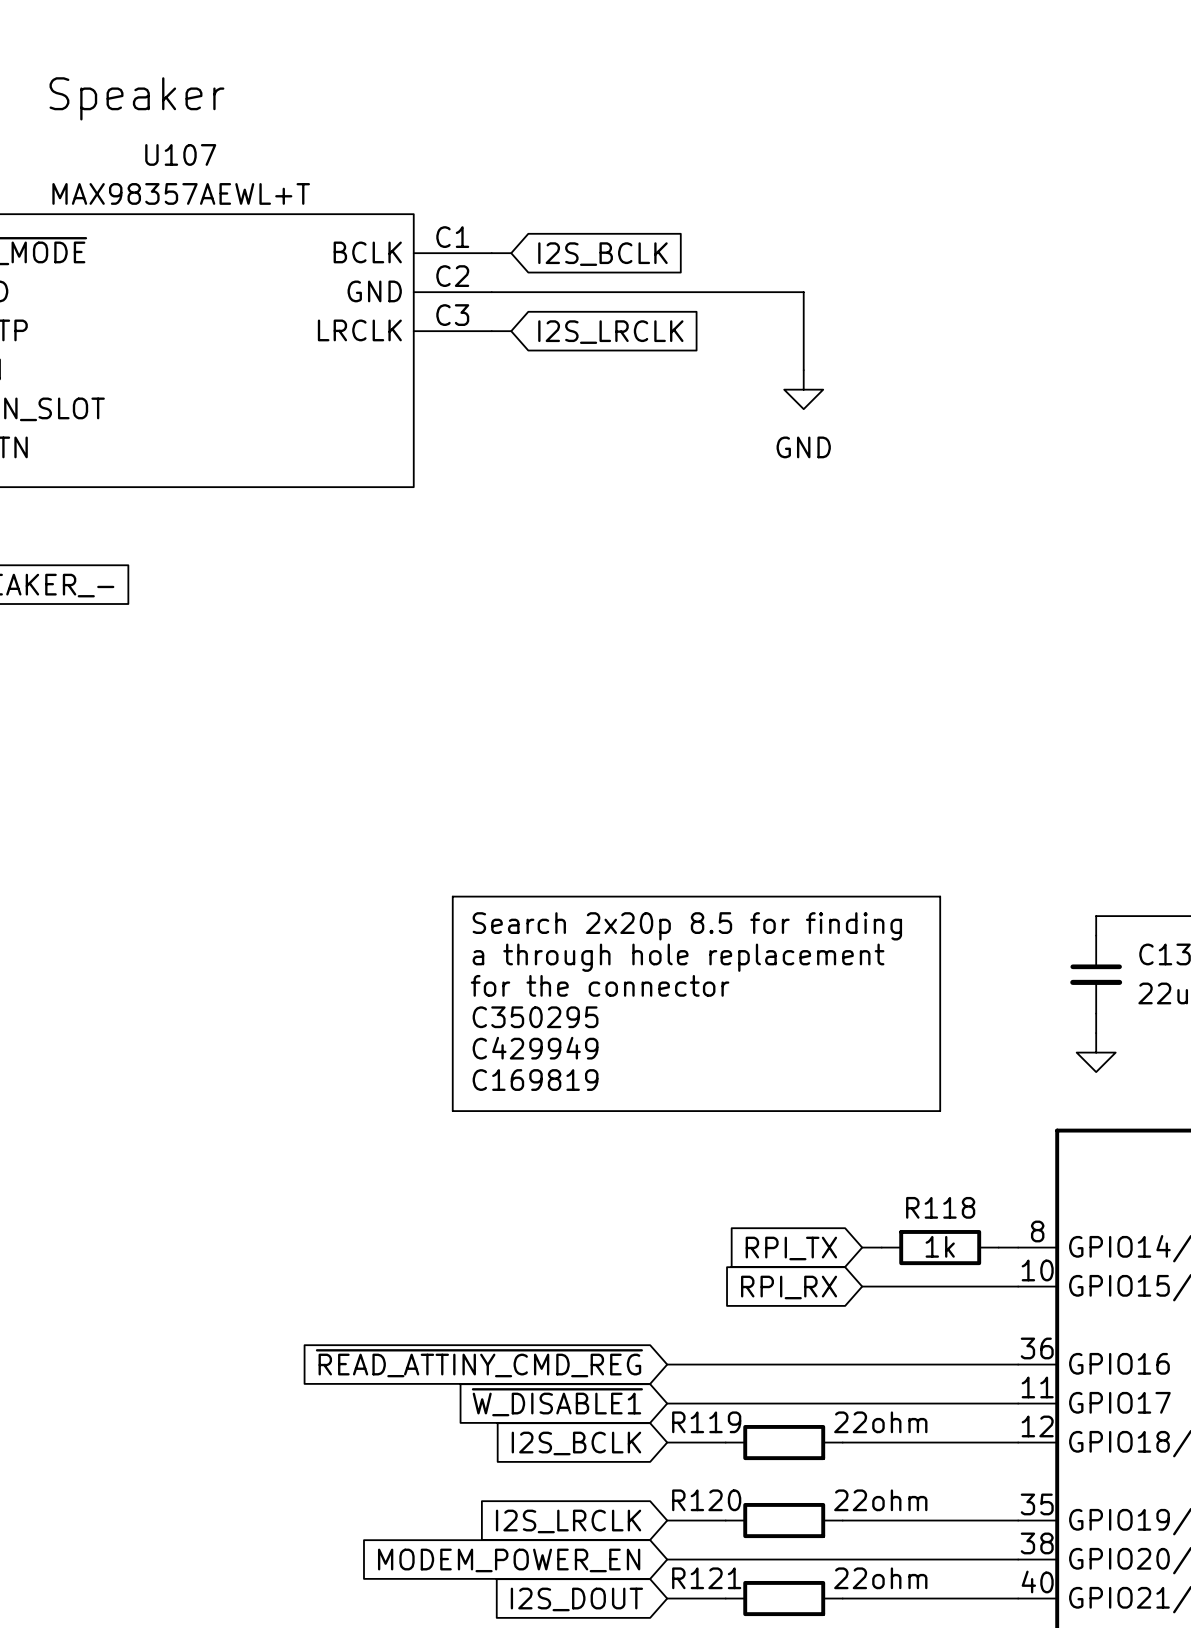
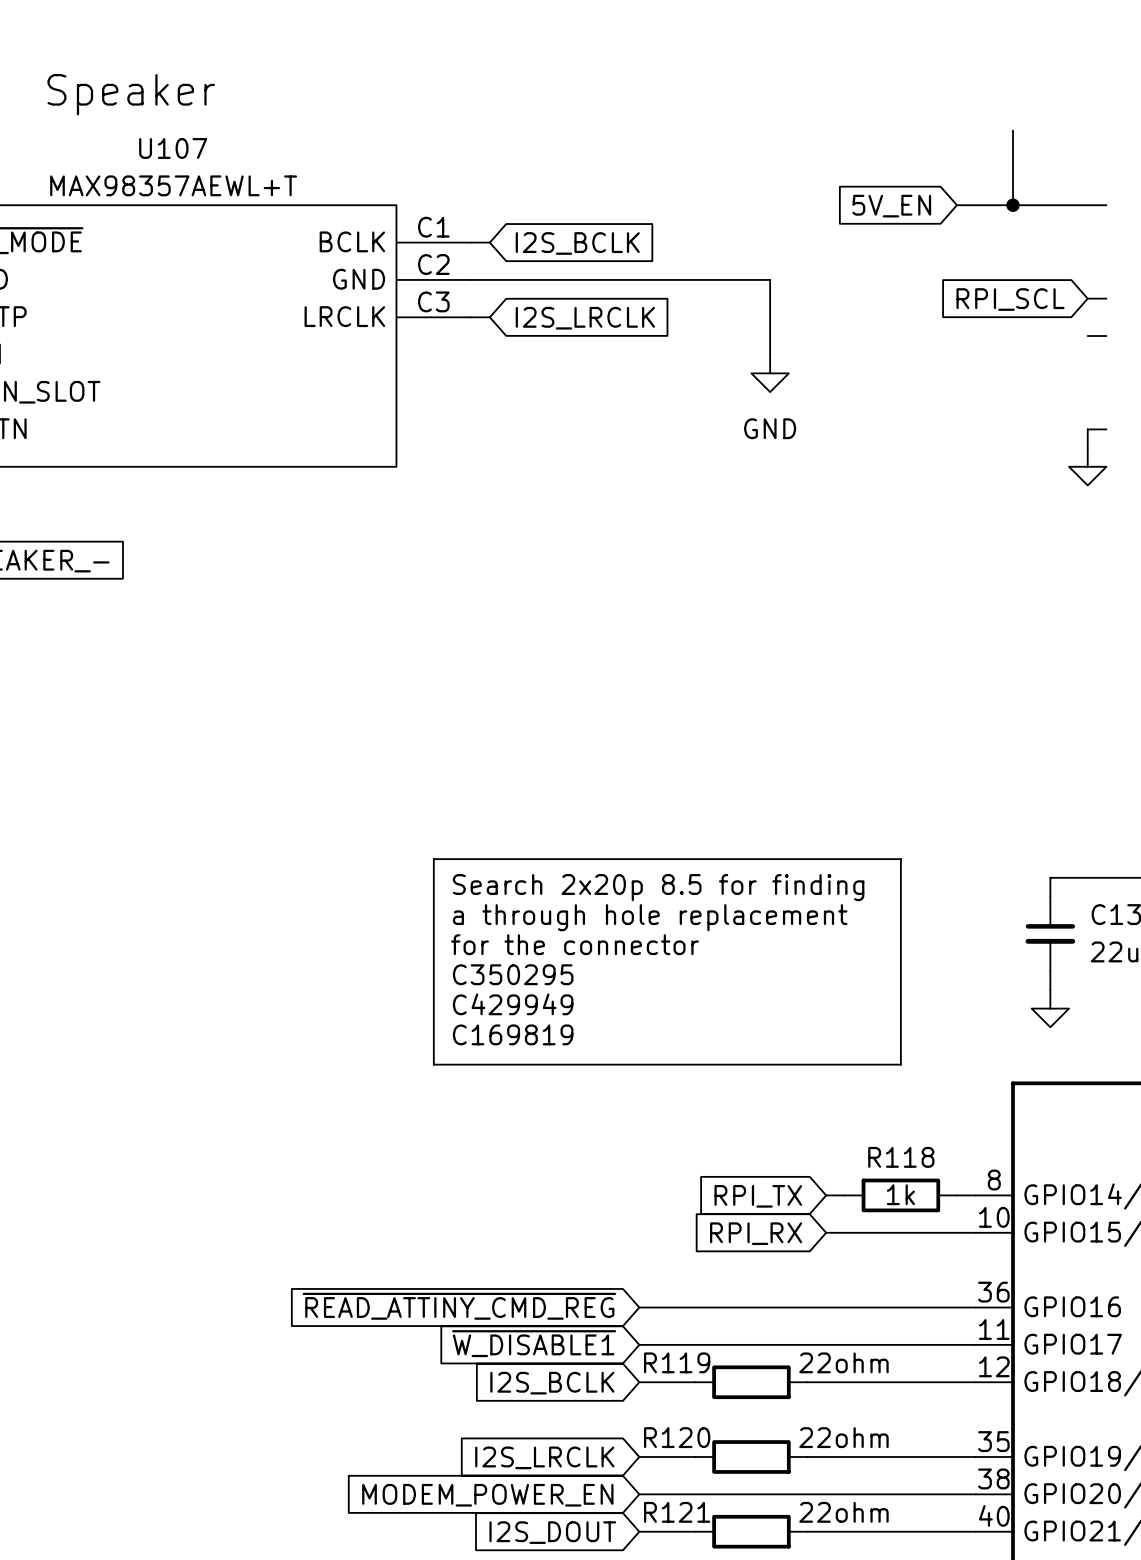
wire: none -> (1013, 130) (1013, 205)
wire: none -> (956, 205) (1106, 205)
junction: none -> (1013, 205)
global label: none -> 5V_EN (891, 206)
wire: none -> (1087, 298) (1106, 298)
global label: none -> RPI_SCL (1010, 299)
wire: none -> (1087, 336) (1106, 336)
wire: none -> (1106, 429) (1087, 429) (1087, 448)
power symbol: none -> (1087, 466)

